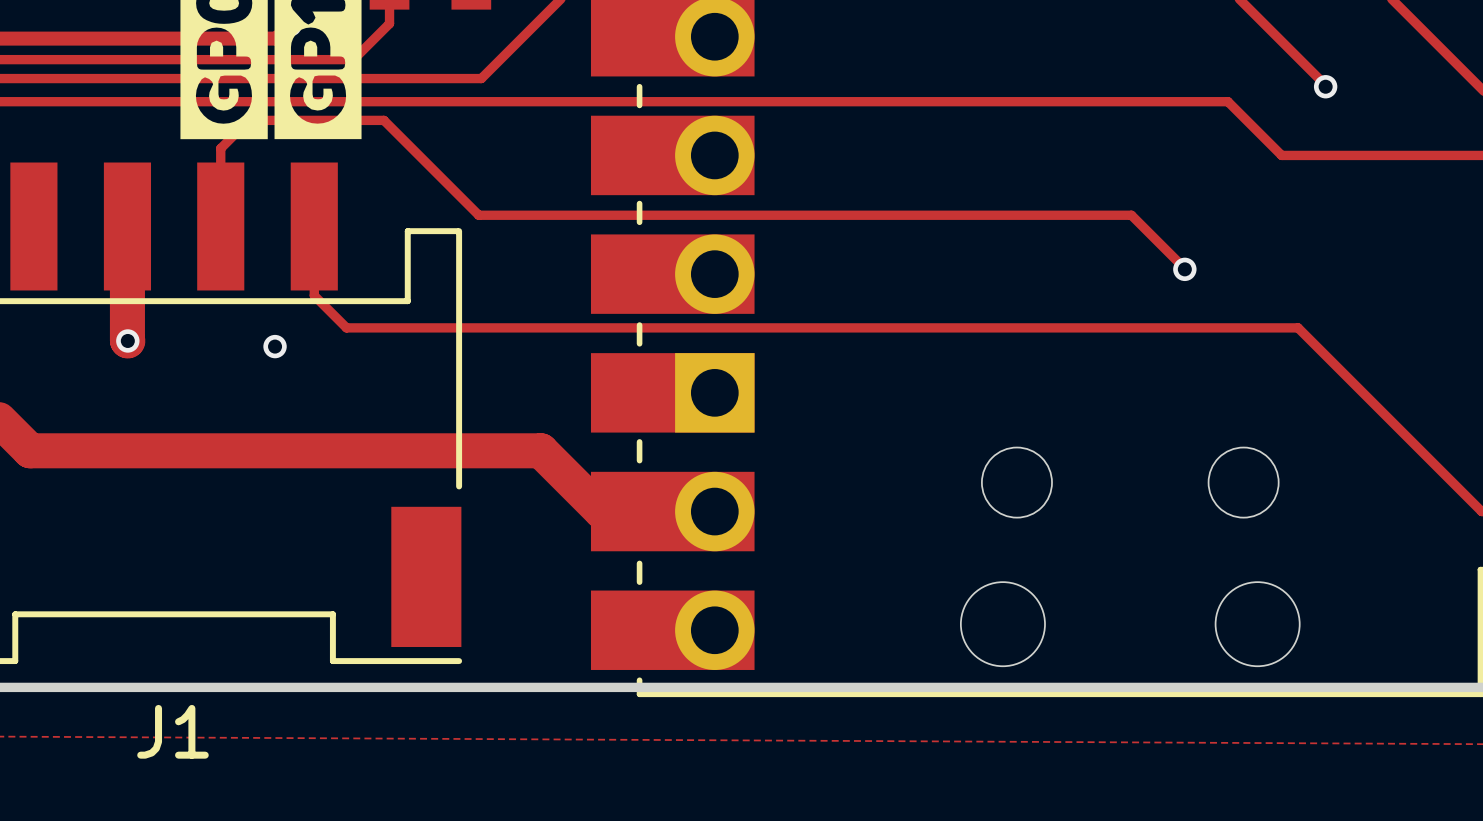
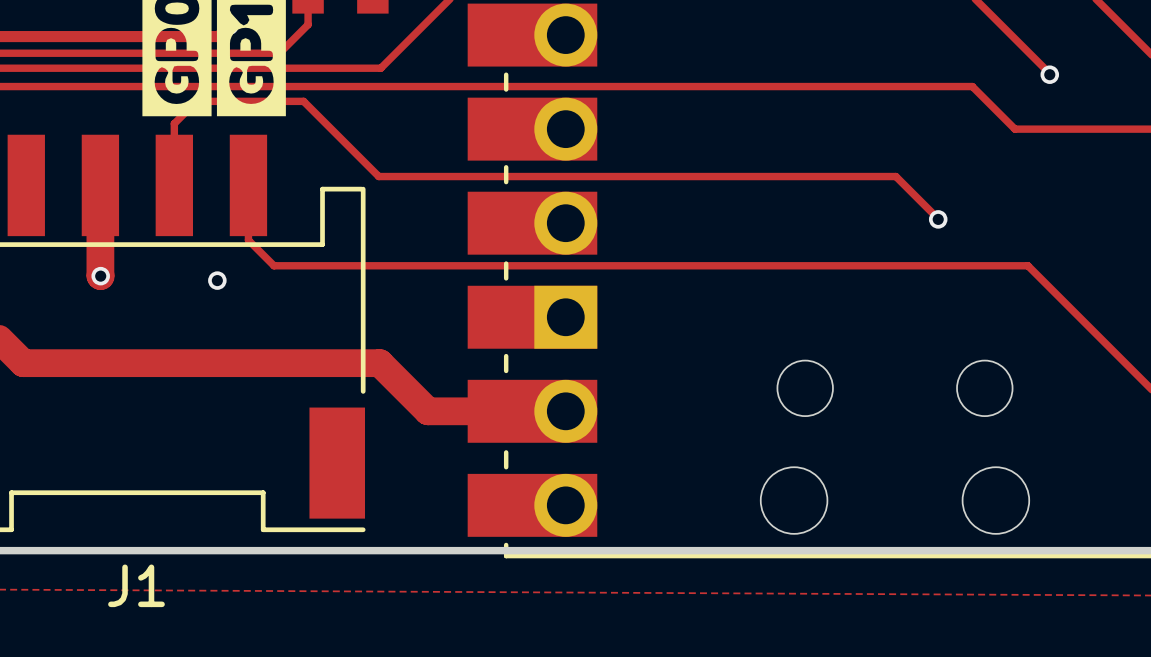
track: (480, 450) (540, 450) (601, 511) -> (379, 363) (428, 411) (476, 411)

